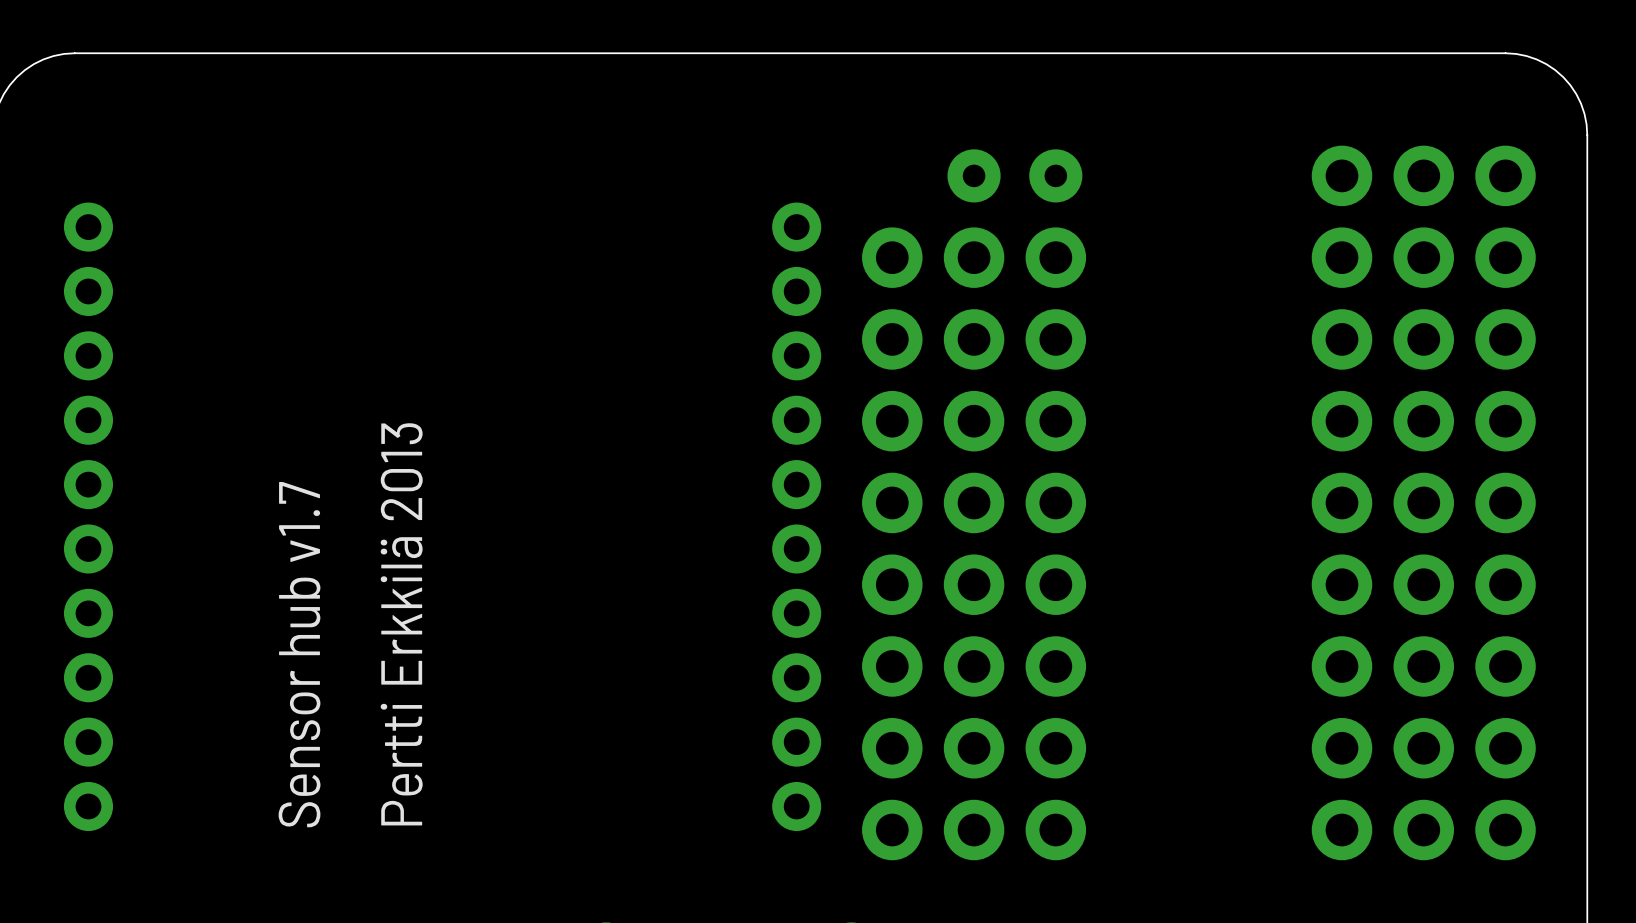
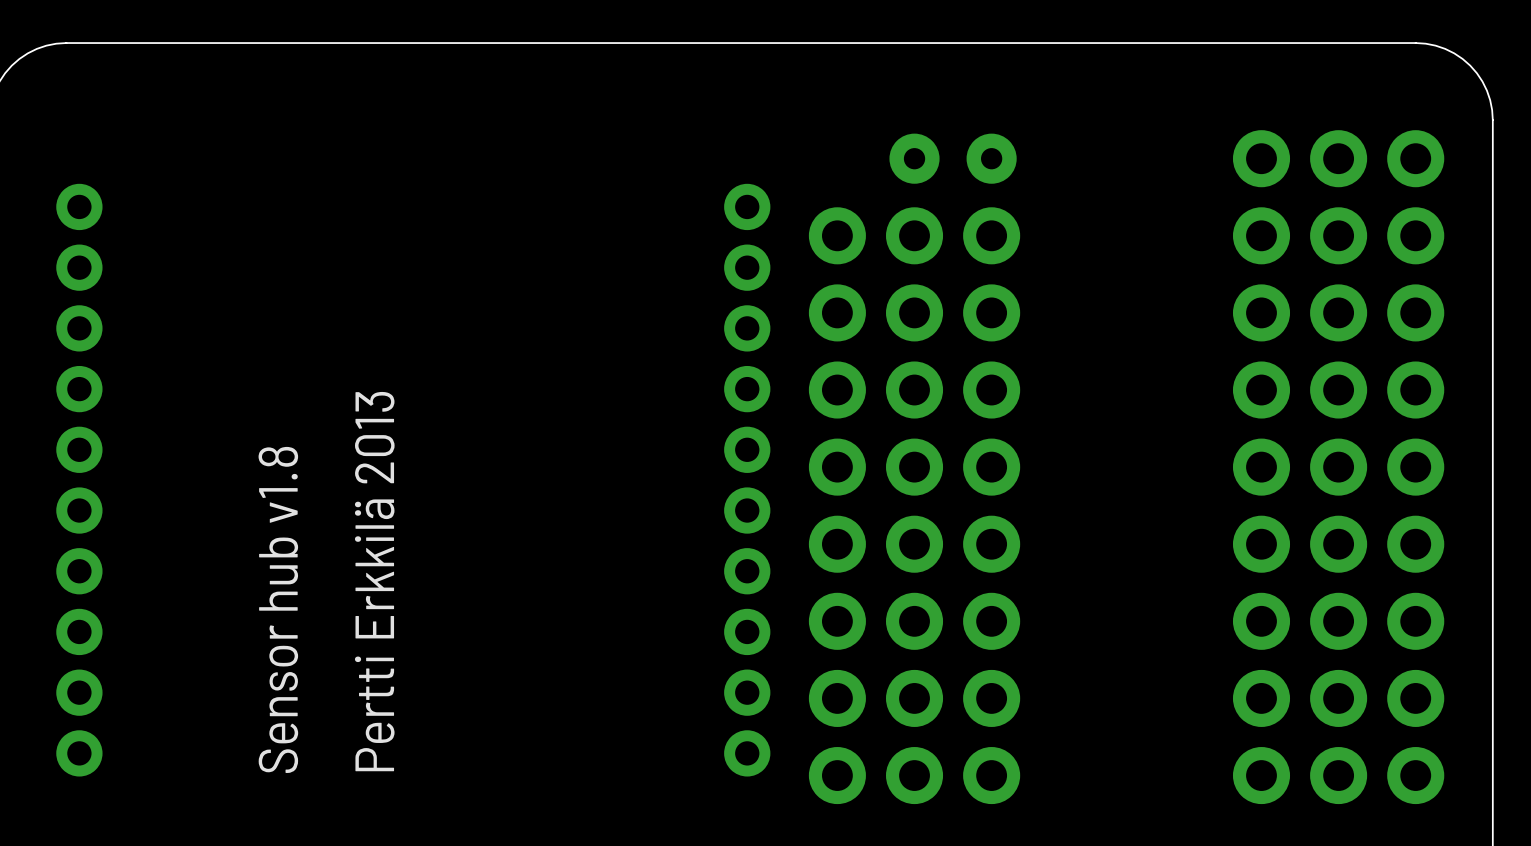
text: Sensor hub v1.7 (299, 654) -> Sensor hub v1.8 (278, 609)

